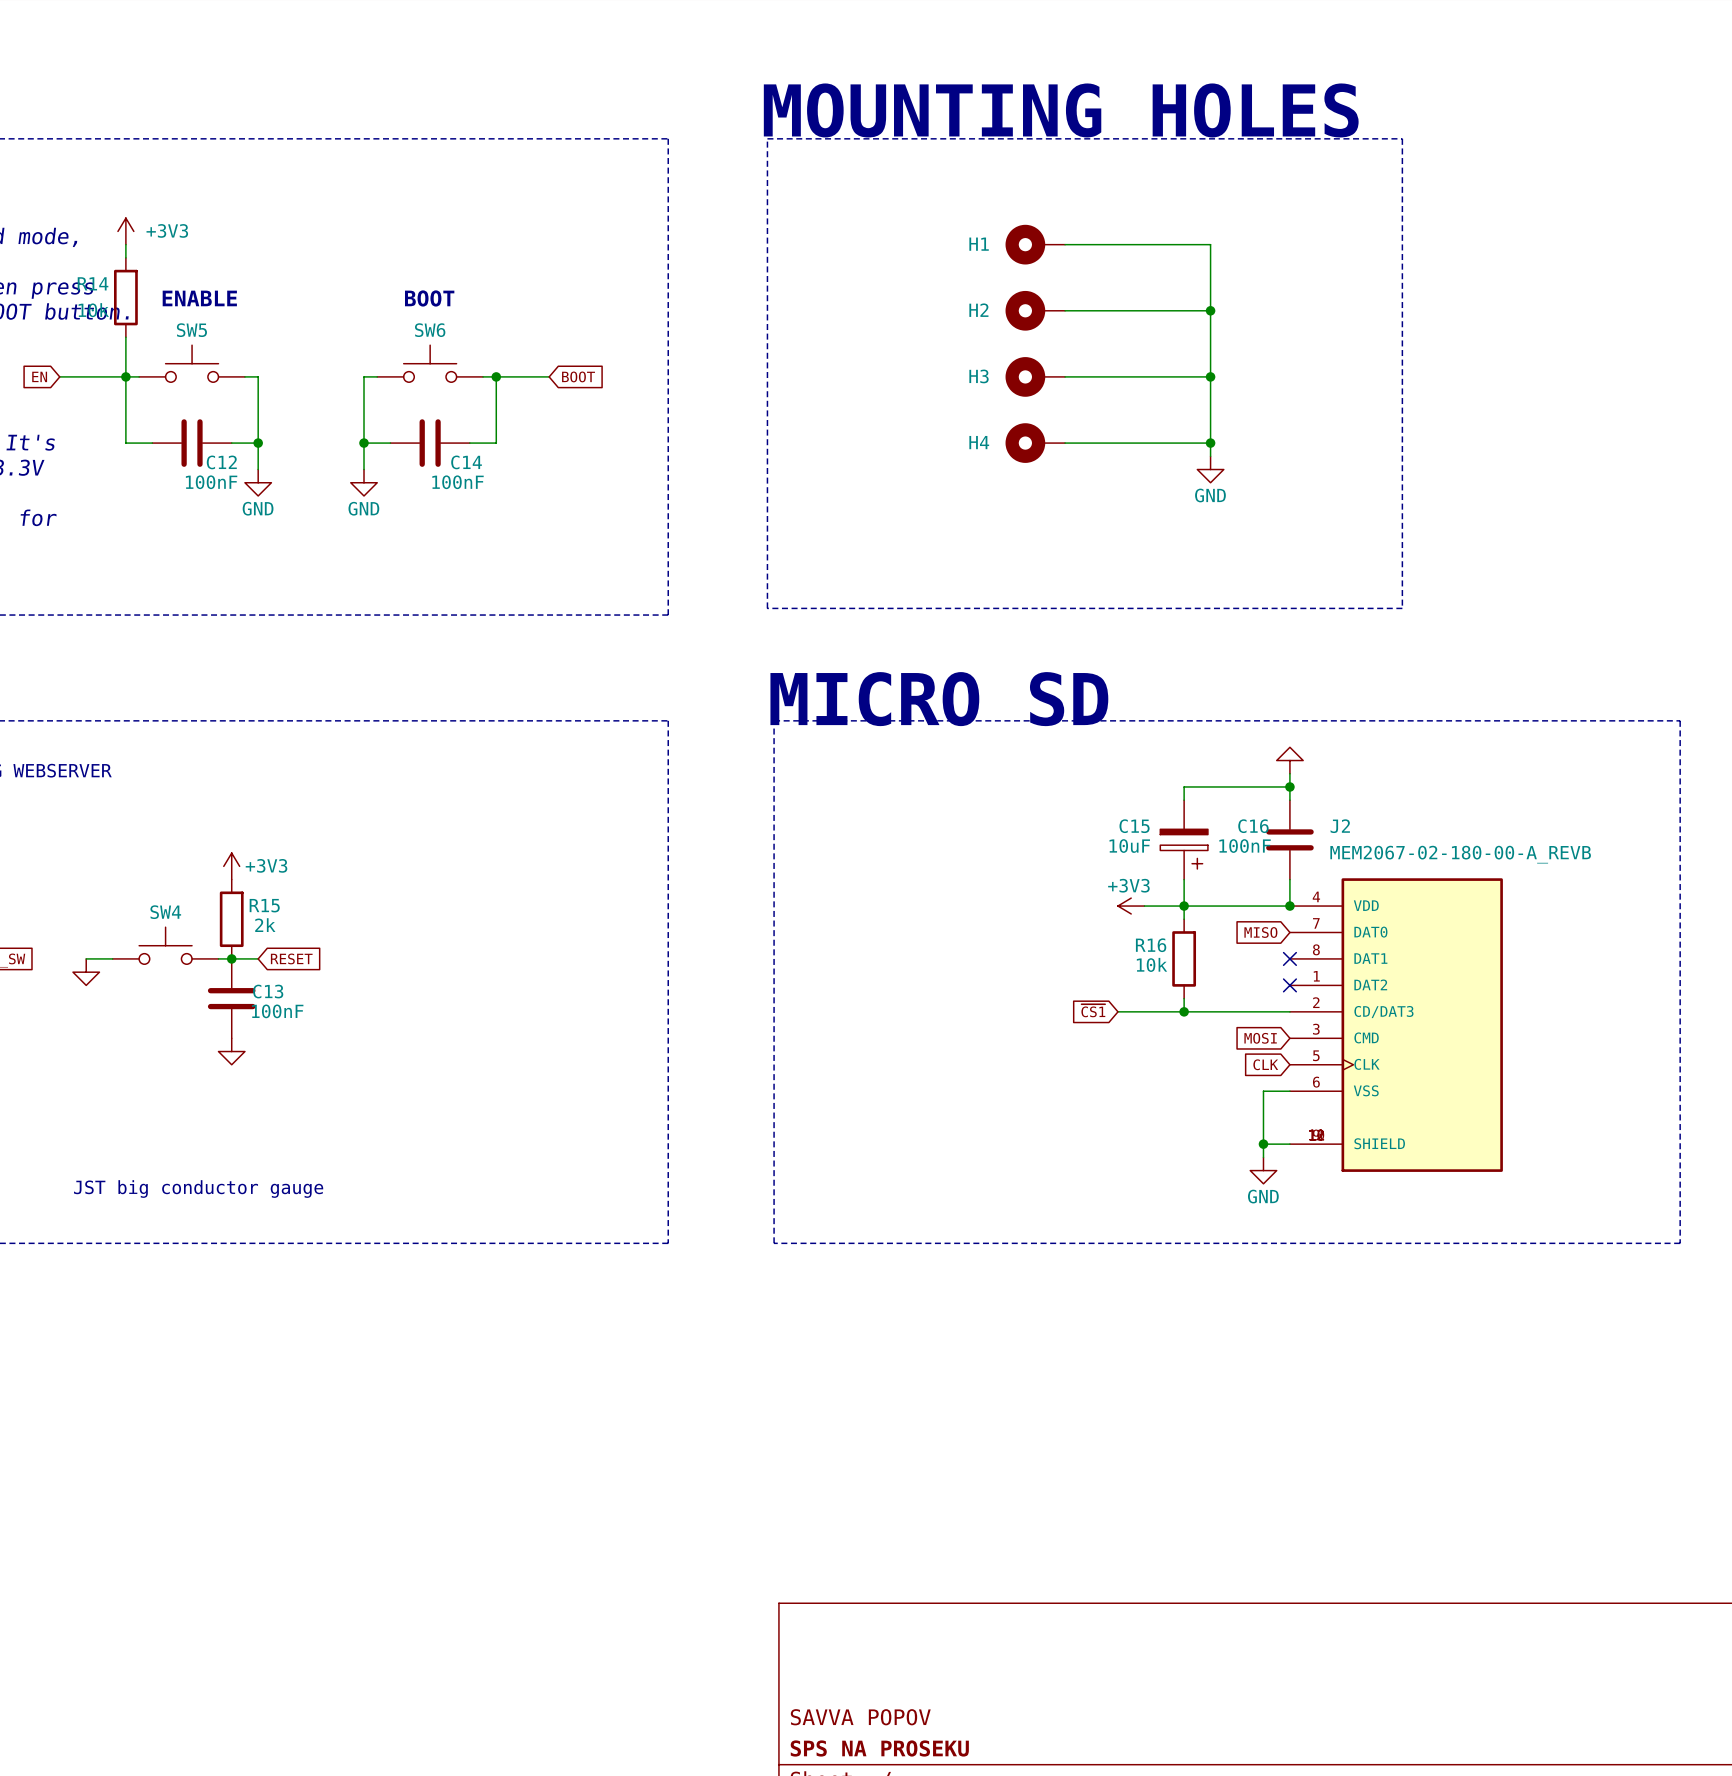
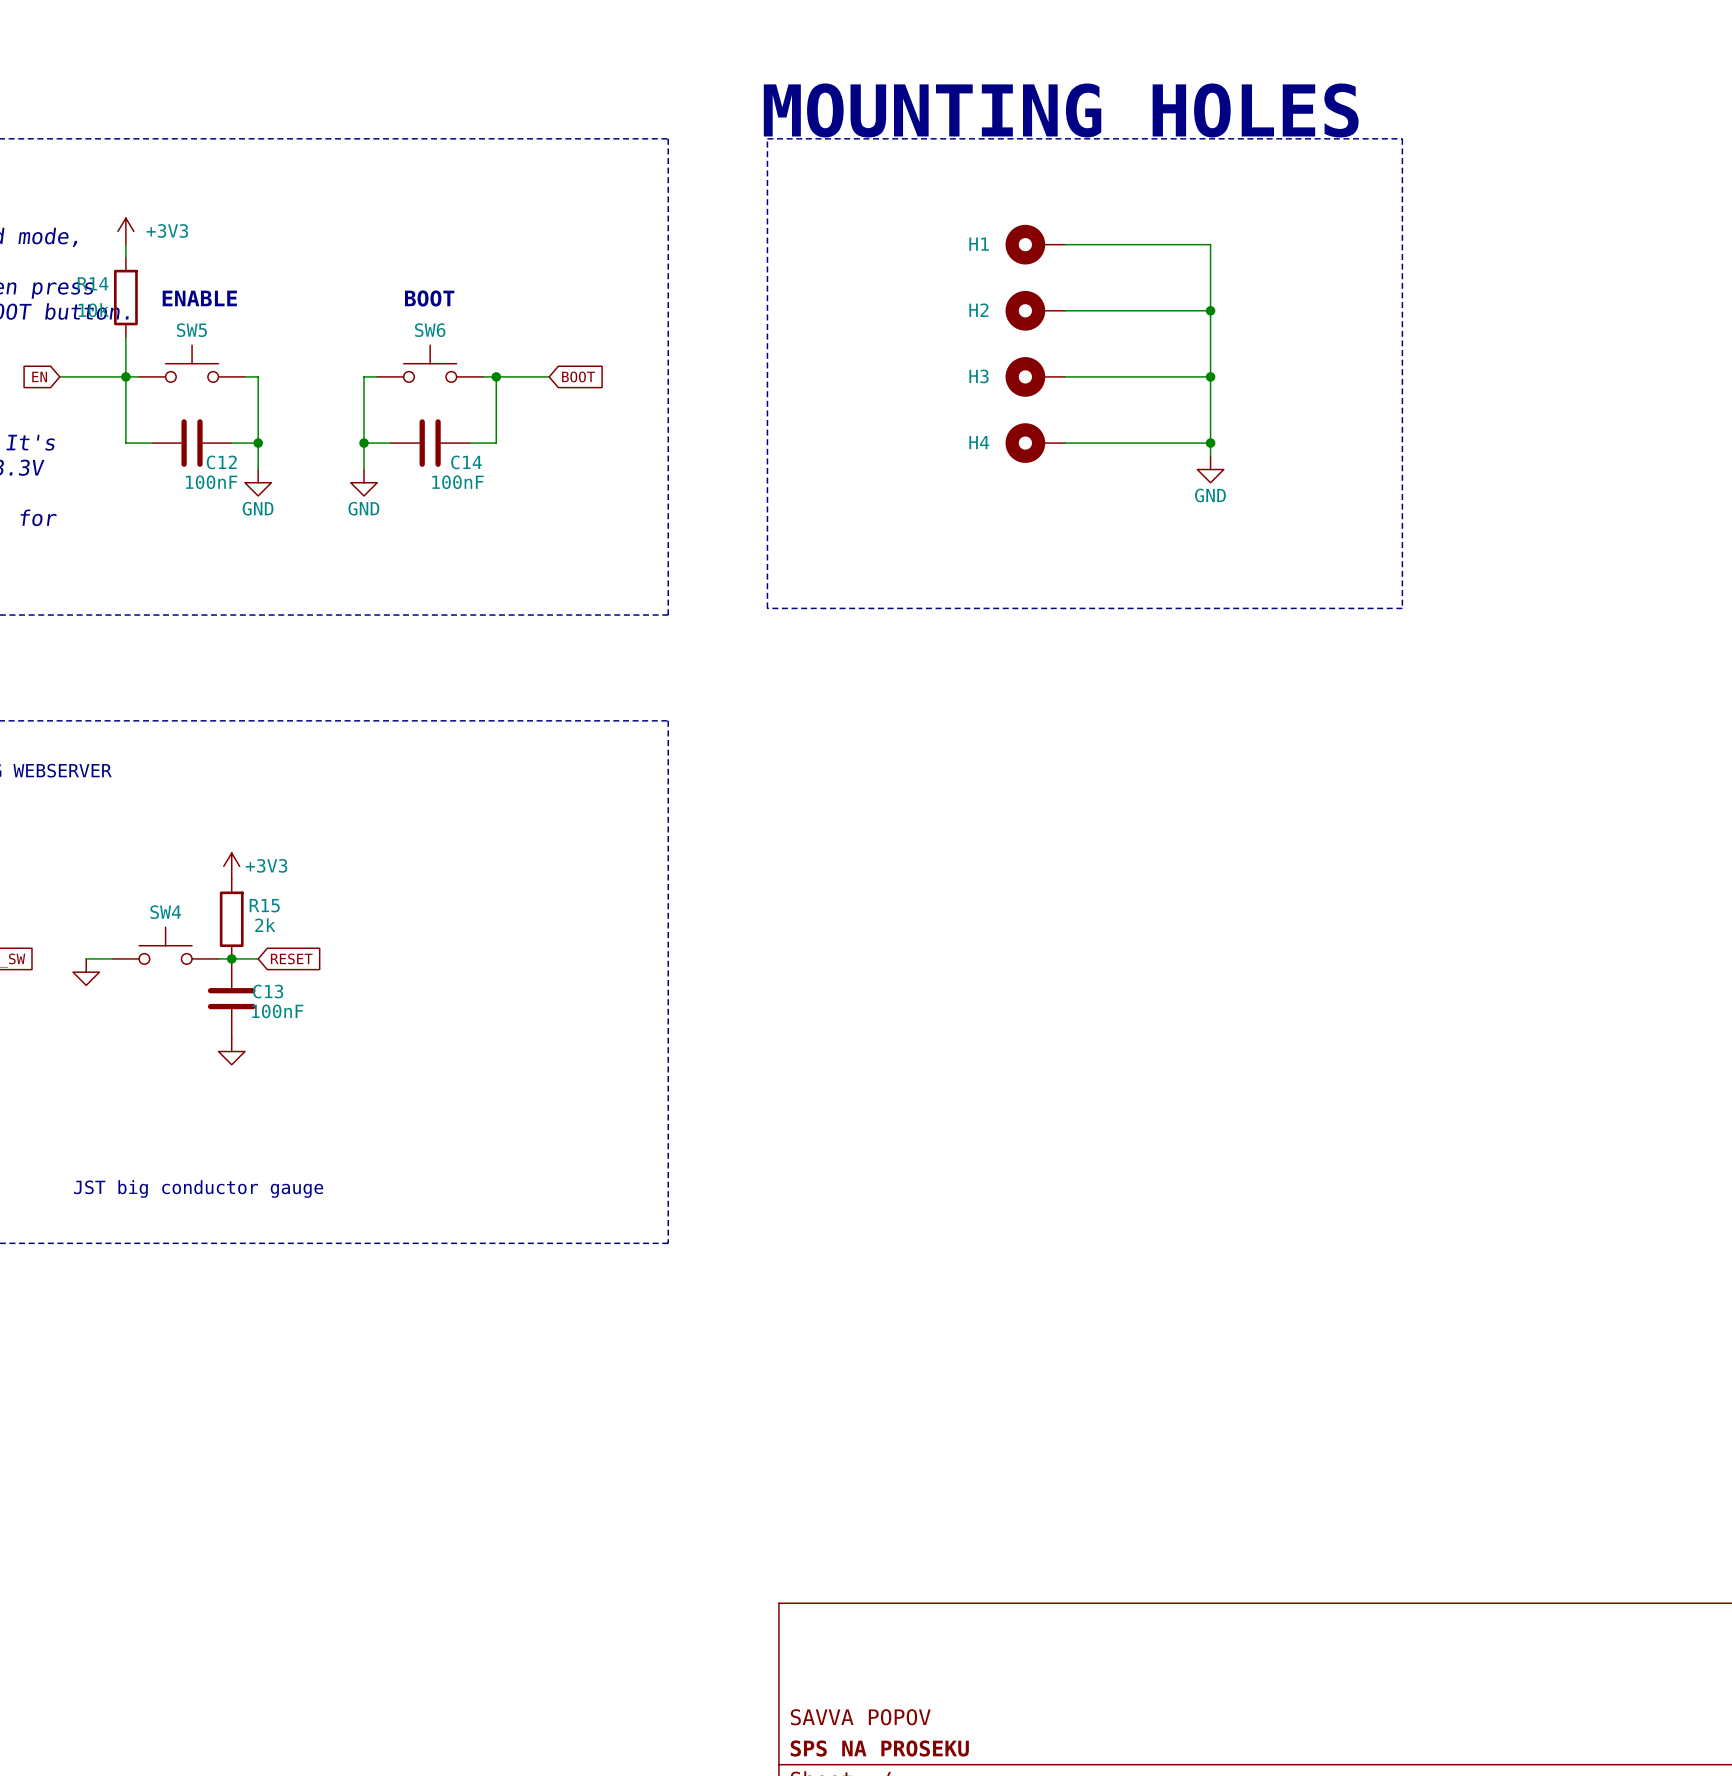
text: MICRO SD (939, 699) -> none
line: (774, 720) (1680, 720) (1680, 1243) (774, 1243) (774, 720) -> none
power symbol: (1289, 760) -> none
wire: (1289, 773) (1289, 800) -> none
wire: (1289, 786) (1184, 786) (1184, 800) -> none
junction: (1289, 786) -> none
C15: 10uF (1184, 839) -> none
C16: 100nF (1289, 839) -> none
wire: (1184, 879) (1184, 919) -> none
wire: (1289, 879) (1289, 906) (1144, 906) -> none
power symbol: +3V3 (1131, 906) -> none
junction: (1184, 906) -> none
junction: (1289, 906) -> none
global label: MISO (1260, 932) -> none
R16: 10k (1184, 958) -> none
no-connect mark: (1289, 958) -> none
no-connect mark: (1289, 985) -> none
wire: (1184, 998) (1184, 1011) -> none
global label: ~{CS1} (1093, 1010) -> none
wire: (1117, 1011) (1289, 1011) -> none
junction: (1184, 1011) -> none
J2: MEM2067-02-180-00-A_REVB (1396, 1025) -> none
global label: MOSI (1260, 1038) -> none
global label: CLK (1265, 1064) -> none
wire: (1289, 1091) (1263, 1091) (1263, 1157) -> none
wire: (1263, 1144) (1289, 1144) -> none
junction: (1263, 1144) -> none
power symbol: GND (1263, 1170) -> none

